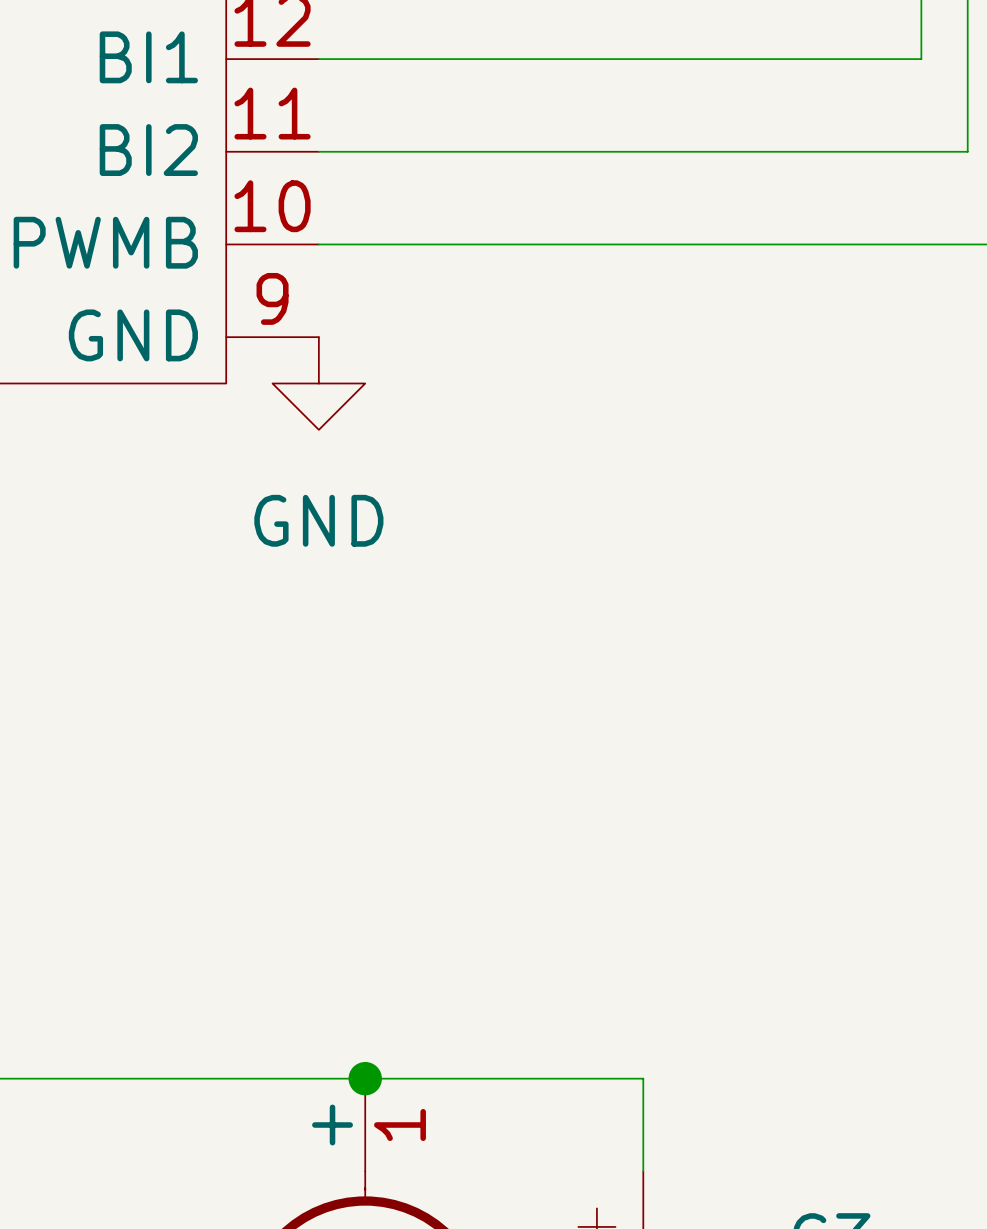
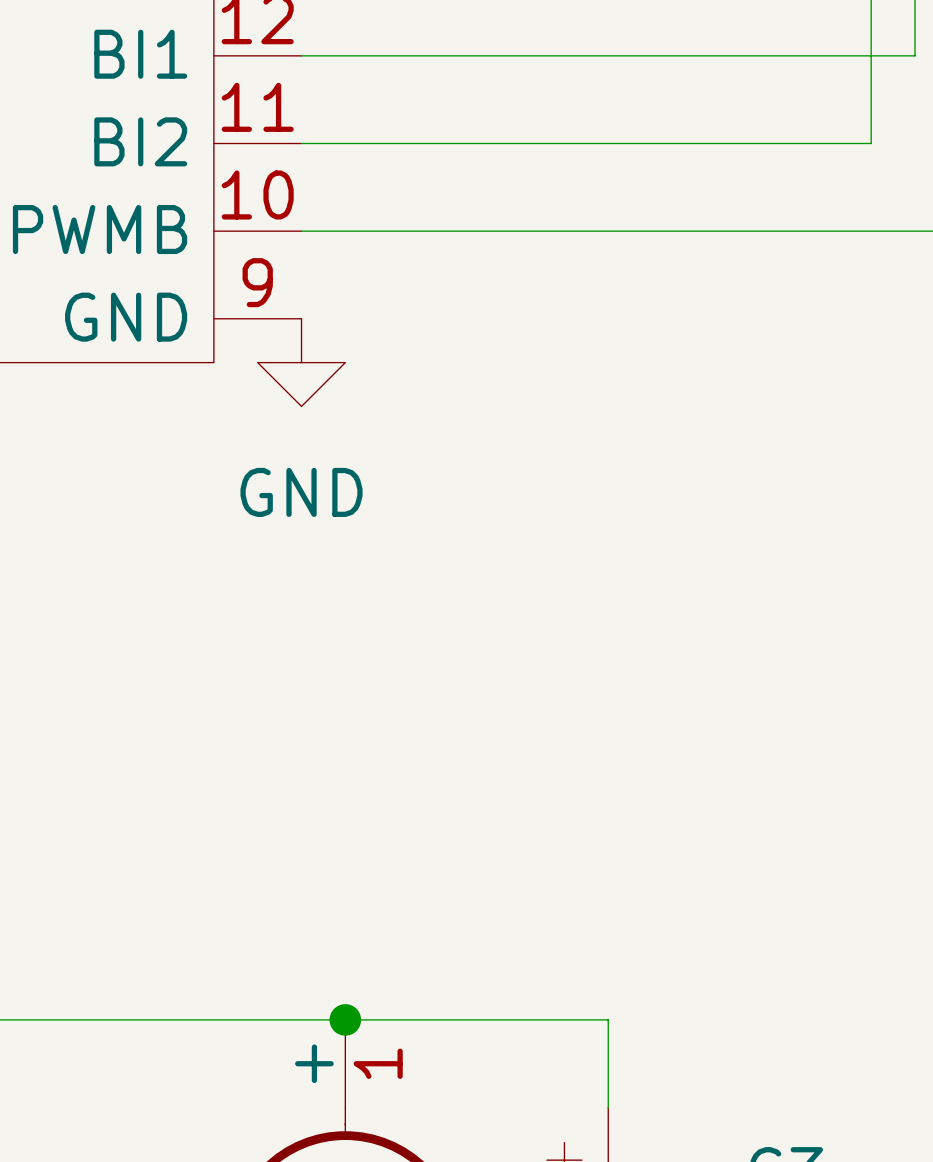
wire: (967, 59) (967, 151) (921, 151) -> (915, 55) (871, 55) (871, 143)

